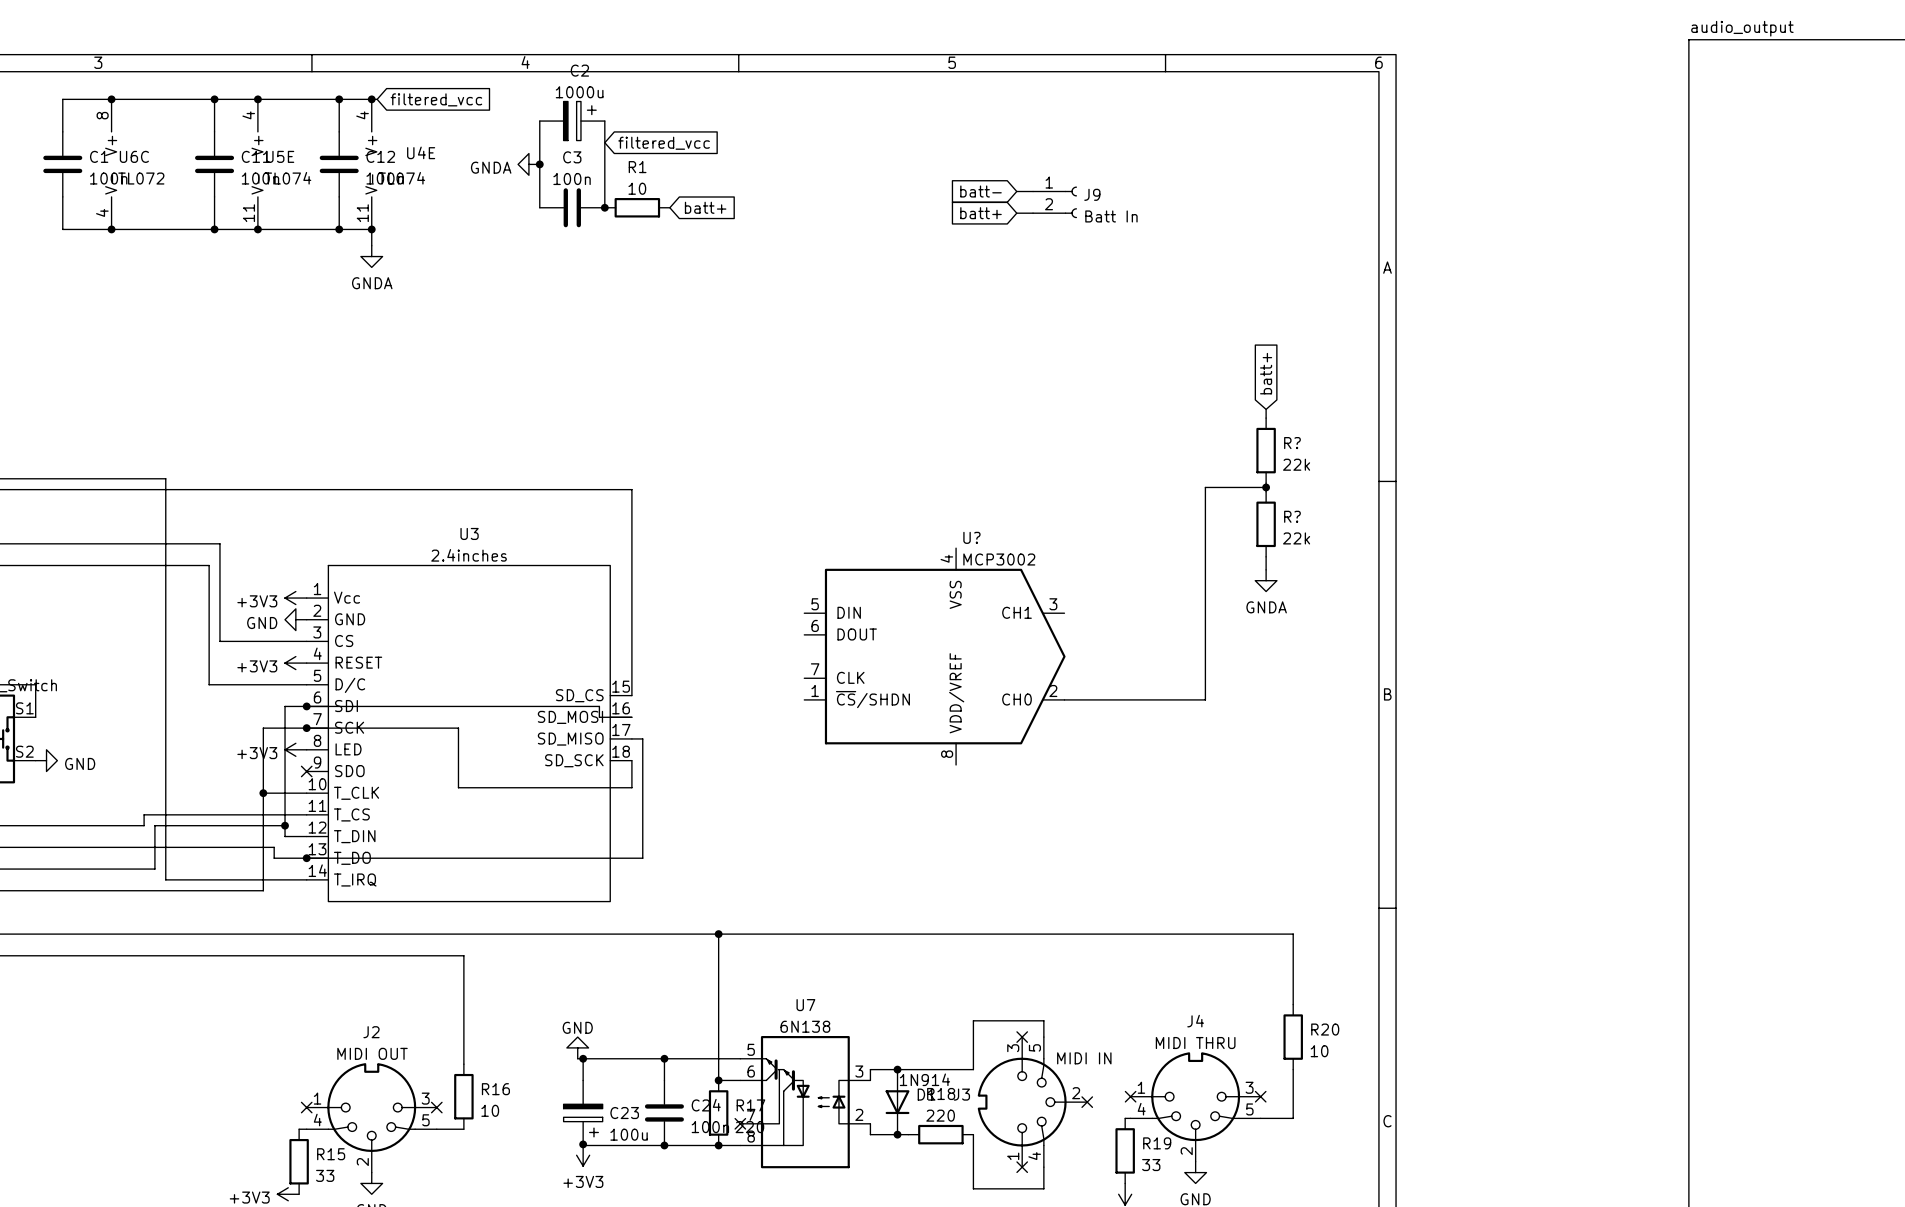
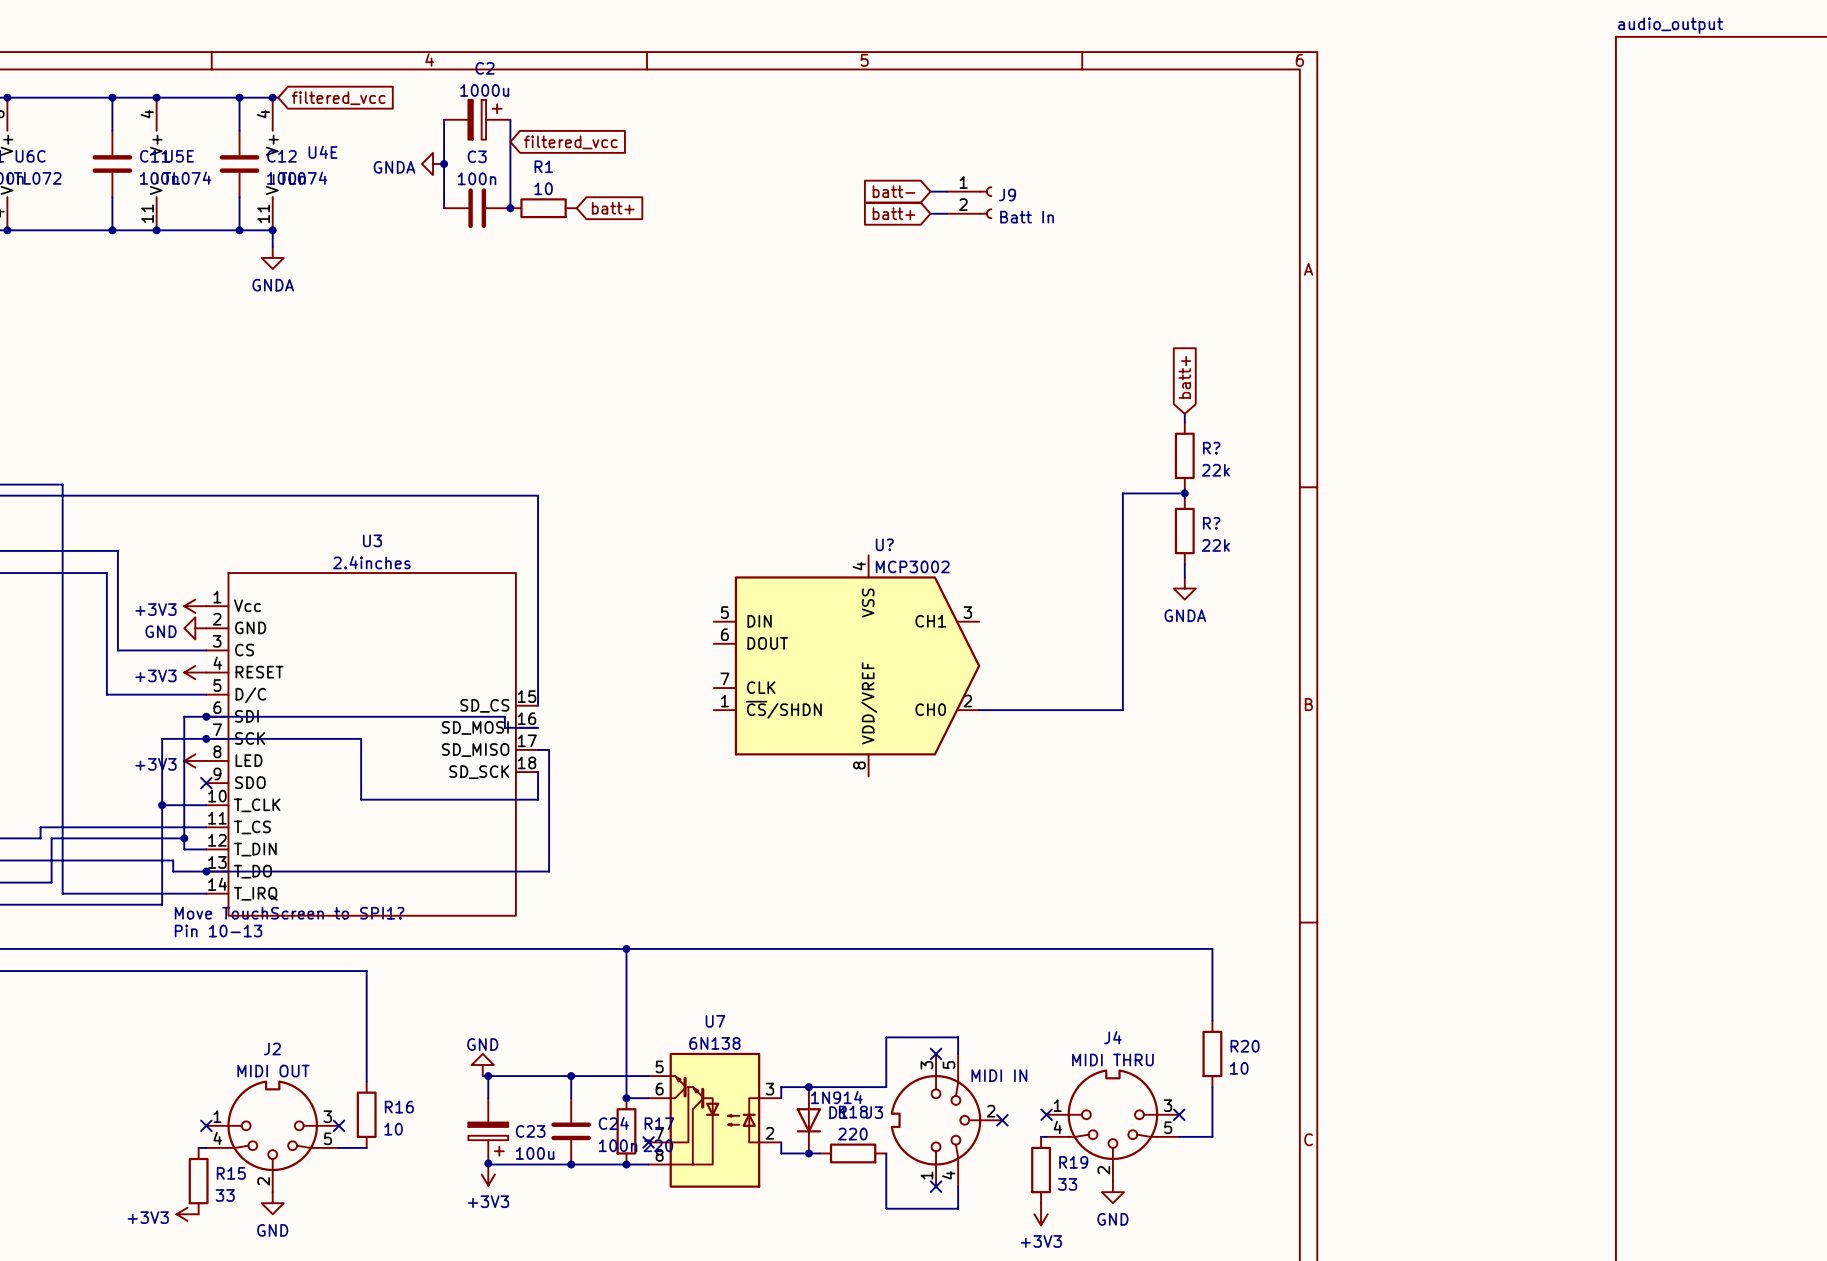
text: none -> Move TouchScreen to SPI1? (289, 913)
text: none -> Pin 10-13 (218, 931)

